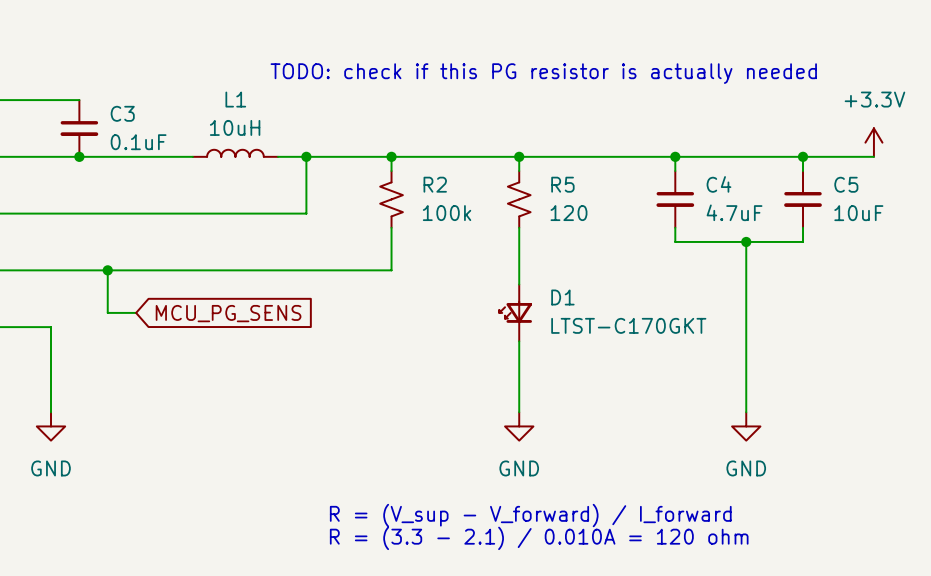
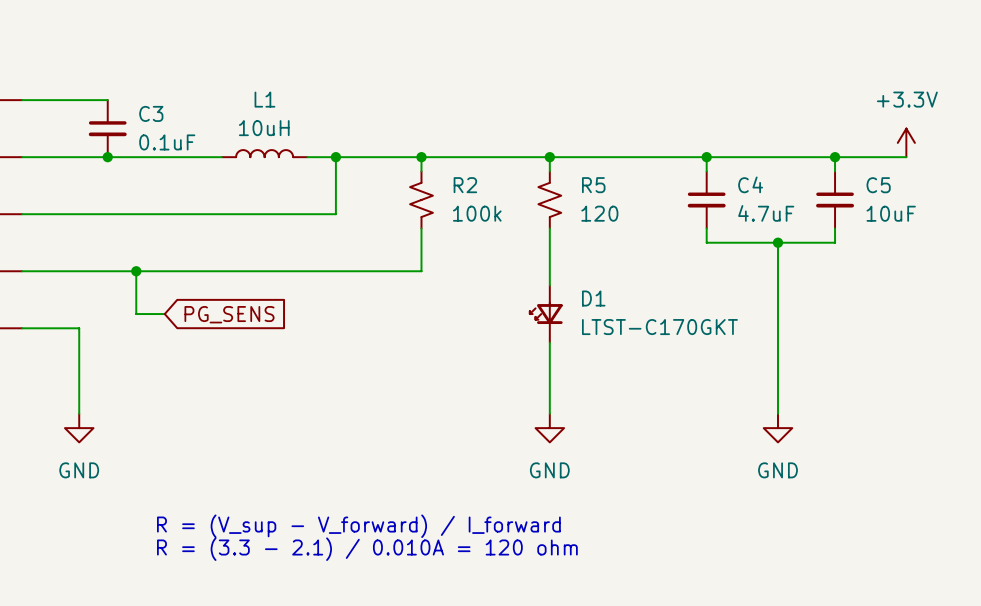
text: TODO: check if this PG resistor is actually needed (543, 73) -> none
global label: MCU_PG_SENS (228, 313) -> PG_SENS (229, 314)
text position: R = (V_sup - V_forward) / I_forward (530, 515) -> R = (V_sup - V_forward) / I_forward (358, 526)
text position: R = (3.3 - 2.1) / 0.010A = 120 ohm (539, 538) -> R = (3.3 - 2.1) / 0.010A = 120 ohm (367, 549)

